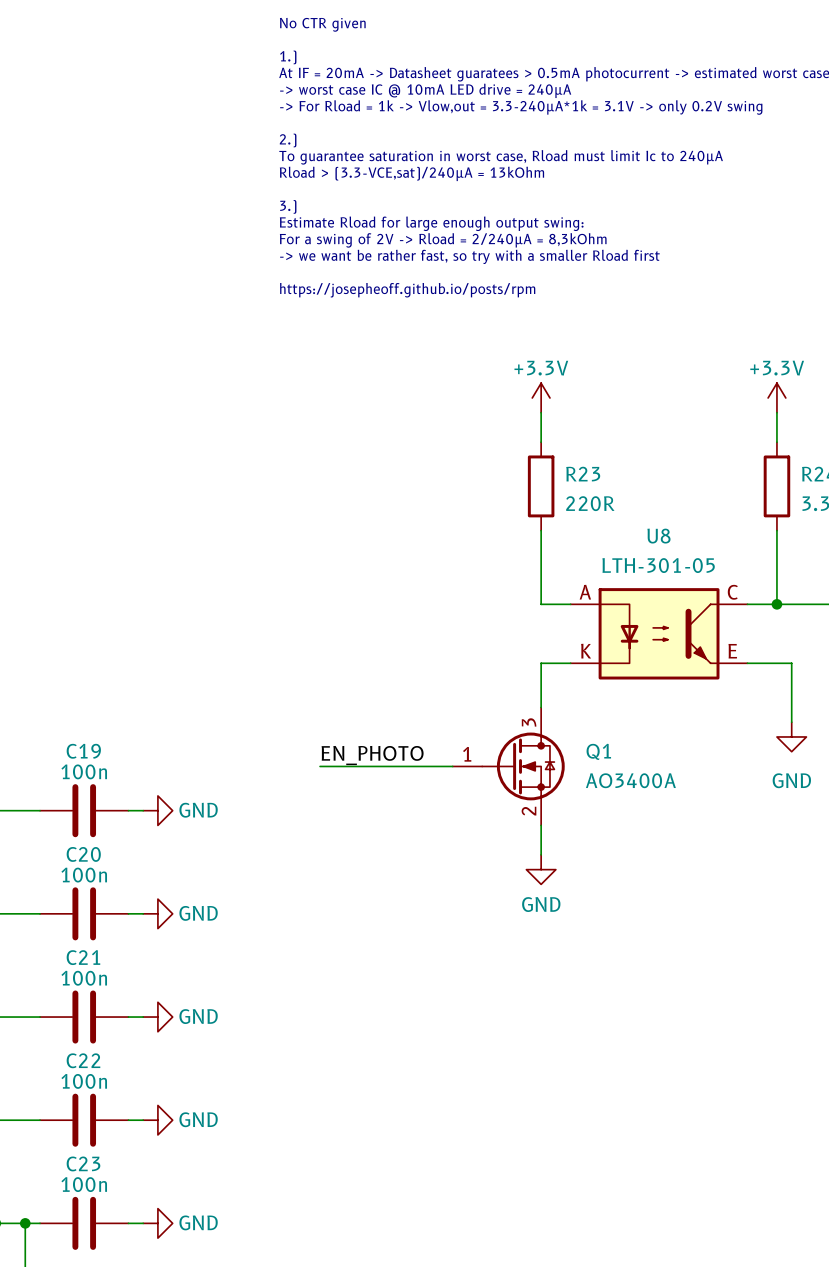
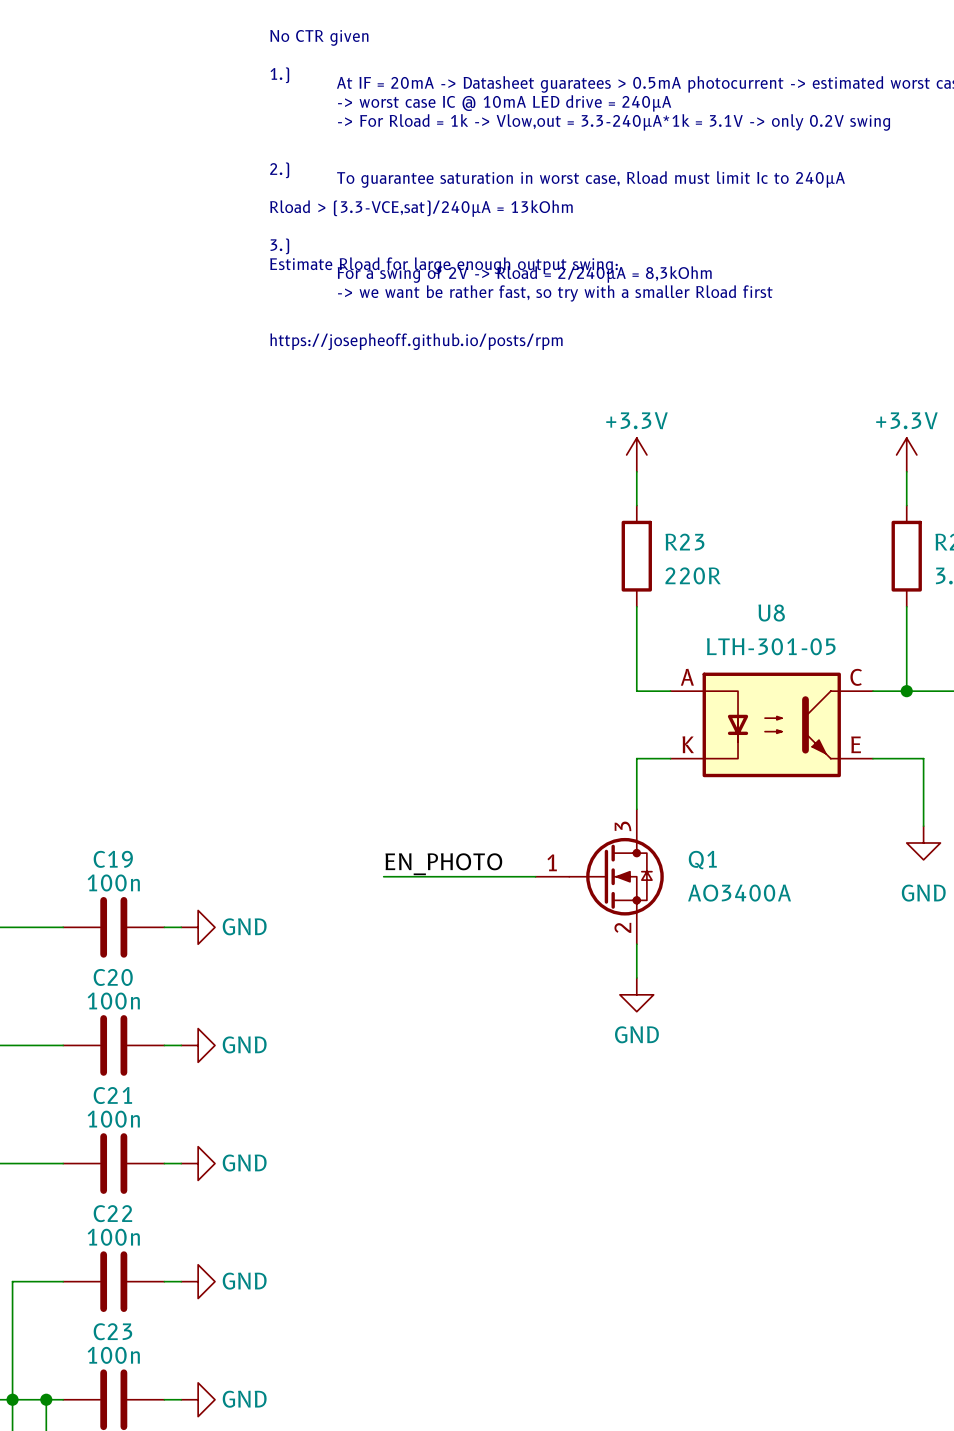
text position: No CTR given (322, 24) -> No CTR given (319, 37)
text position: 1.) (288, 57) -> 1.) (279, 75)
text position: 2.) (288, 140) -> 2.) (279, 170)
text position: Rload > (3.3-VCE,sat)/240µA = 13kOhm (411, 173) -> Rload > (3.3-VCE,sat)/240µA = 13kOhm (421, 208)
text position: 3.) (288, 206) -> 3.) (279, 246)
text position: Estimate Rload for large enough output swing: (431, 223) -> Estimate Rload for large enough output swing: (444, 265)
text position: https://josepheoff.github.io/posts/rpm (407, 290) -> https://josepheoff.github.io/posts/rpm (416, 341)

